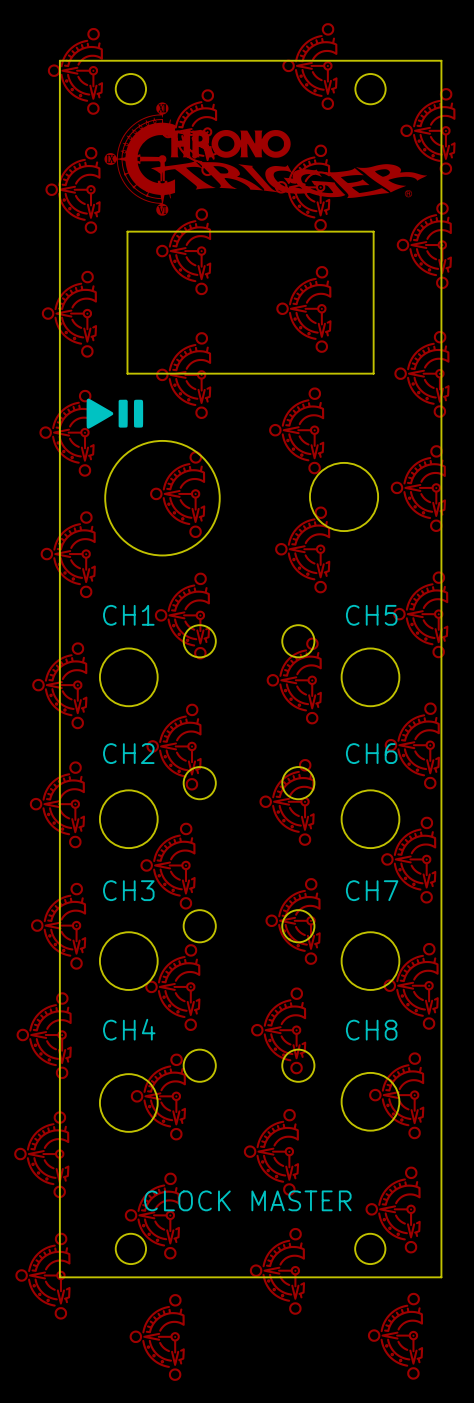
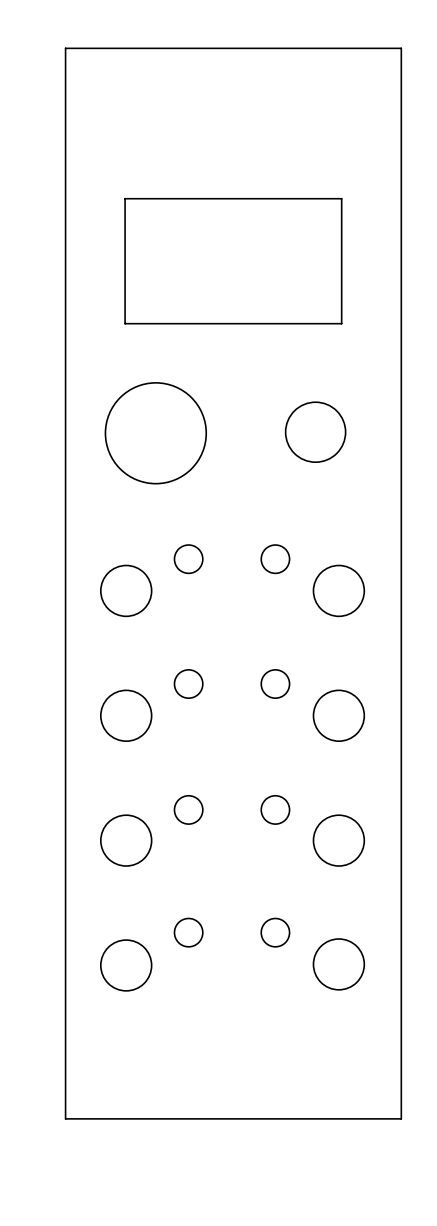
drawing: [45, 23, 456, 296] -> none
round board edge: [115, 73, 147, 105] -> none
round board edge: [354, 73, 387, 105] -> none
drawing: [276, 266, 332, 353] -> none
drawing: [41, 270, 98, 358] -> none
drawing: [394, 330, 450, 418] -> none
drawing: [156, 332, 212, 419] -> none
drawing: [269, 387, 325, 475] -> none
drawing: [39, 389, 144, 477] -> none
drawing: [390, 445, 446, 532] -> none
drawing: [150, 451, 206, 539] -> none
drawing: [275, 506, 331, 594] -> none
drawing: [40, 511, 96, 599] -> none
drawing: [393, 571, 449, 659] -> none
drawing: [154, 572, 211, 660] -> none
text: CH1 (128, 615) -> none
text: CH5 (371, 615) -> none
drawing: [266, 637, 322, 725] -> none
drawing: [32, 642, 88, 730] -> none
drawing: [384, 702, 440, 790] -> none
drawing: [146, 703, 202, 791] -> none
text: CH2 (128, 753) -> none
text: CH6 (371, 753) -> none
drawing: [259, 759, 315, 846] -> none
drawing: [29, 761, 86, 849] -> none
drawing: [381, 816, 437, 904] -> none
drawing: [140, 822, 196, 910] -> none
drawing: [265, 878, 321, 965] -> none
drawing: [31, 882, 87, 970] -> none
text: CH3 (128, 890) -> none
text: CH7 (372, 890) -> none
drawing: [383, 942, 439, 1030] -> none
drawing: [145, 944, 201, 1032] -> none
drawing: [251, 987, 307, 1075] -> none
drawing: [16, 992, 72, 1080] -> none
text: CH4 (129, 1029) -> none
text: CH8 (371, 1030) -> none
drawing: [369, 1052, 425, 1140] -> none
drawing: [130, 1053, 187, 1141] -> none
drawing: [243, 1108, 300, 1196] -> none
drawing: [14, 1111, 70, 1199] -> none
drawing: [365, 1166, 421, 1254] -> none
drawing: [124, 1172, 181, 1260] -> none
text: CLOCK MASTER (247, 1200) -> none
drawing: [249, 1227, 306, 1315] -> none
drawing: [15, 1232, 71, 1320] -> none
round board edge: [115, 1233, 147, 1265] -> none
round board edge: [354, 1233, 386, 1265] -> none
drawing: [367, 1292, 424, 1380] -> none
drawing: [129, 1294, 185, 1381] -> none

